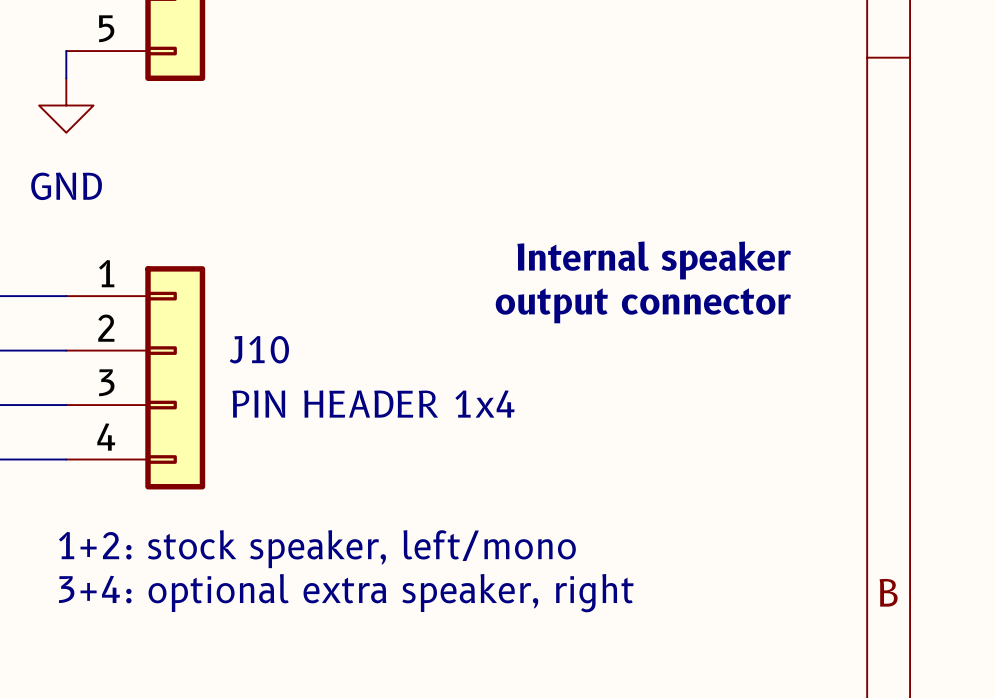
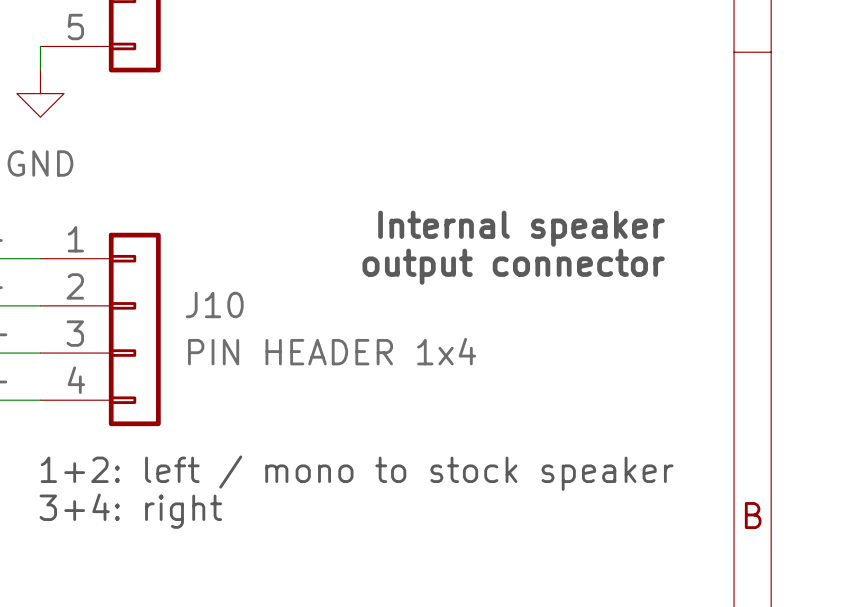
text: none -> 1+2: left / mono to stock speaker (357, 473)
text: 1+2: stock speaker, left/mono (317, 549) -> none
text: none -> 3+4: right (130, 511)
text: 3+4: optional extra speaker, right (346, 593) -> none

